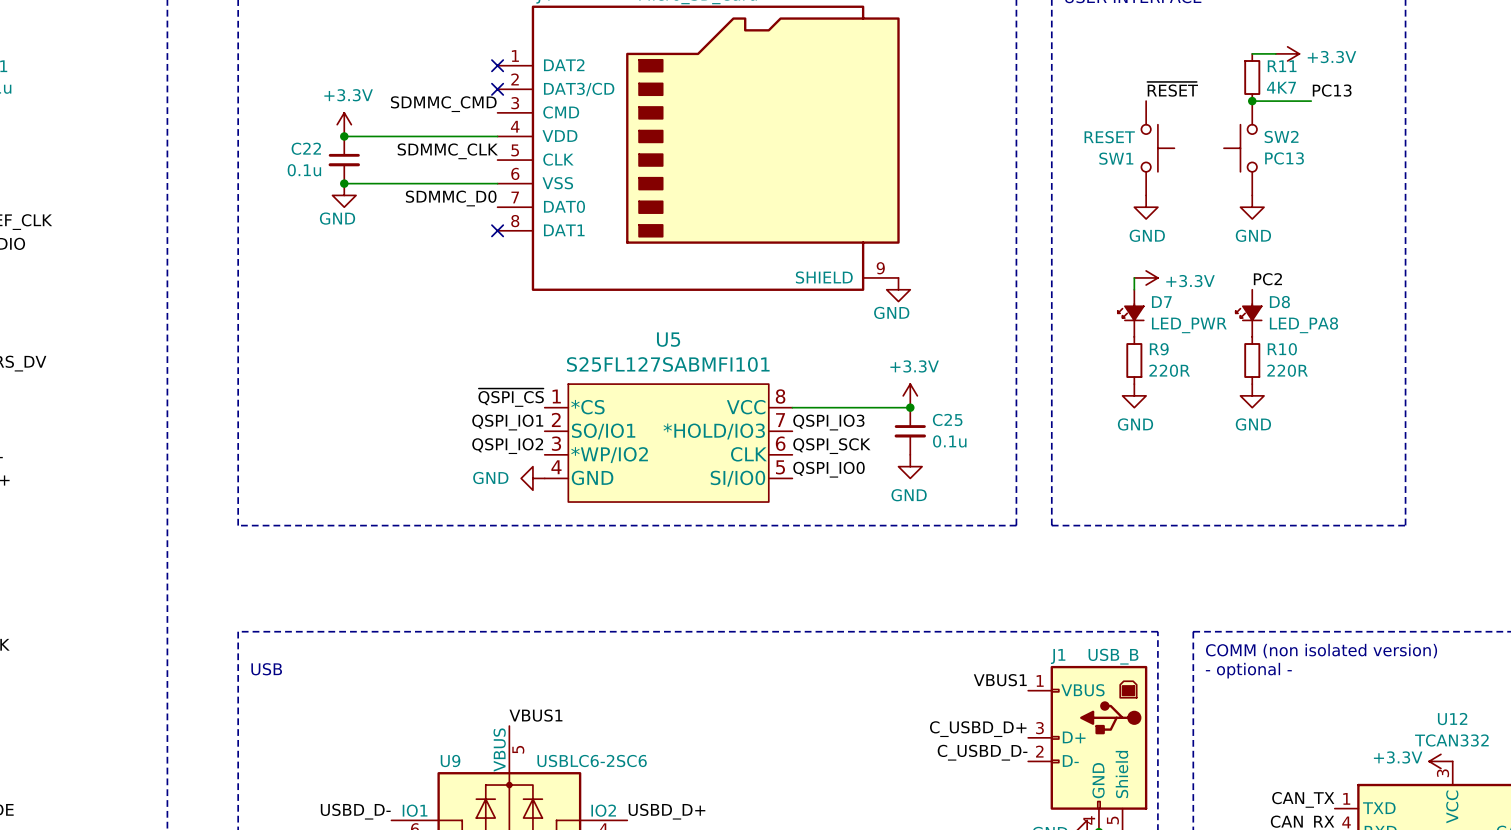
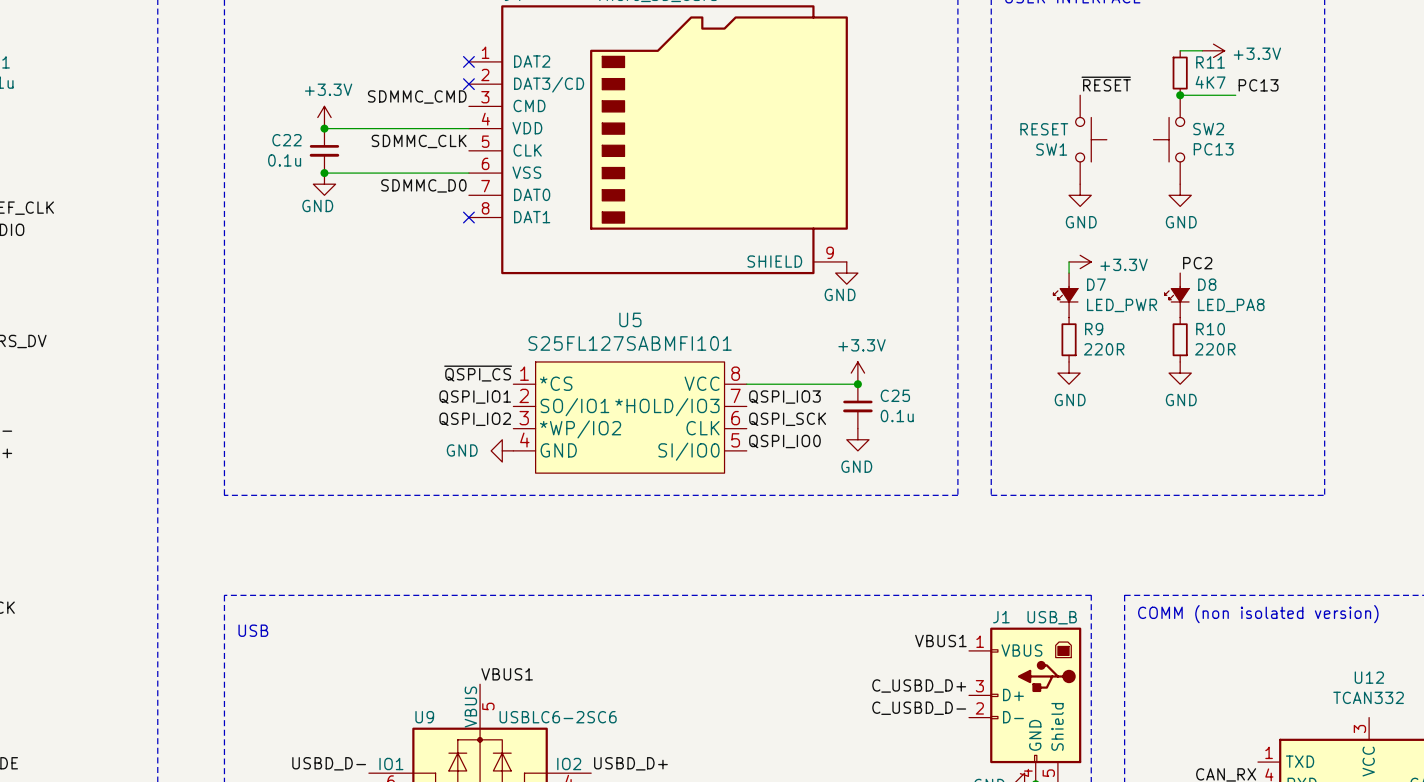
text: - optional - (1248, 670) -> none
power symbol: +3.3V (1440, 761) -> none
label: CAN_TX (1303, 799) -> none

